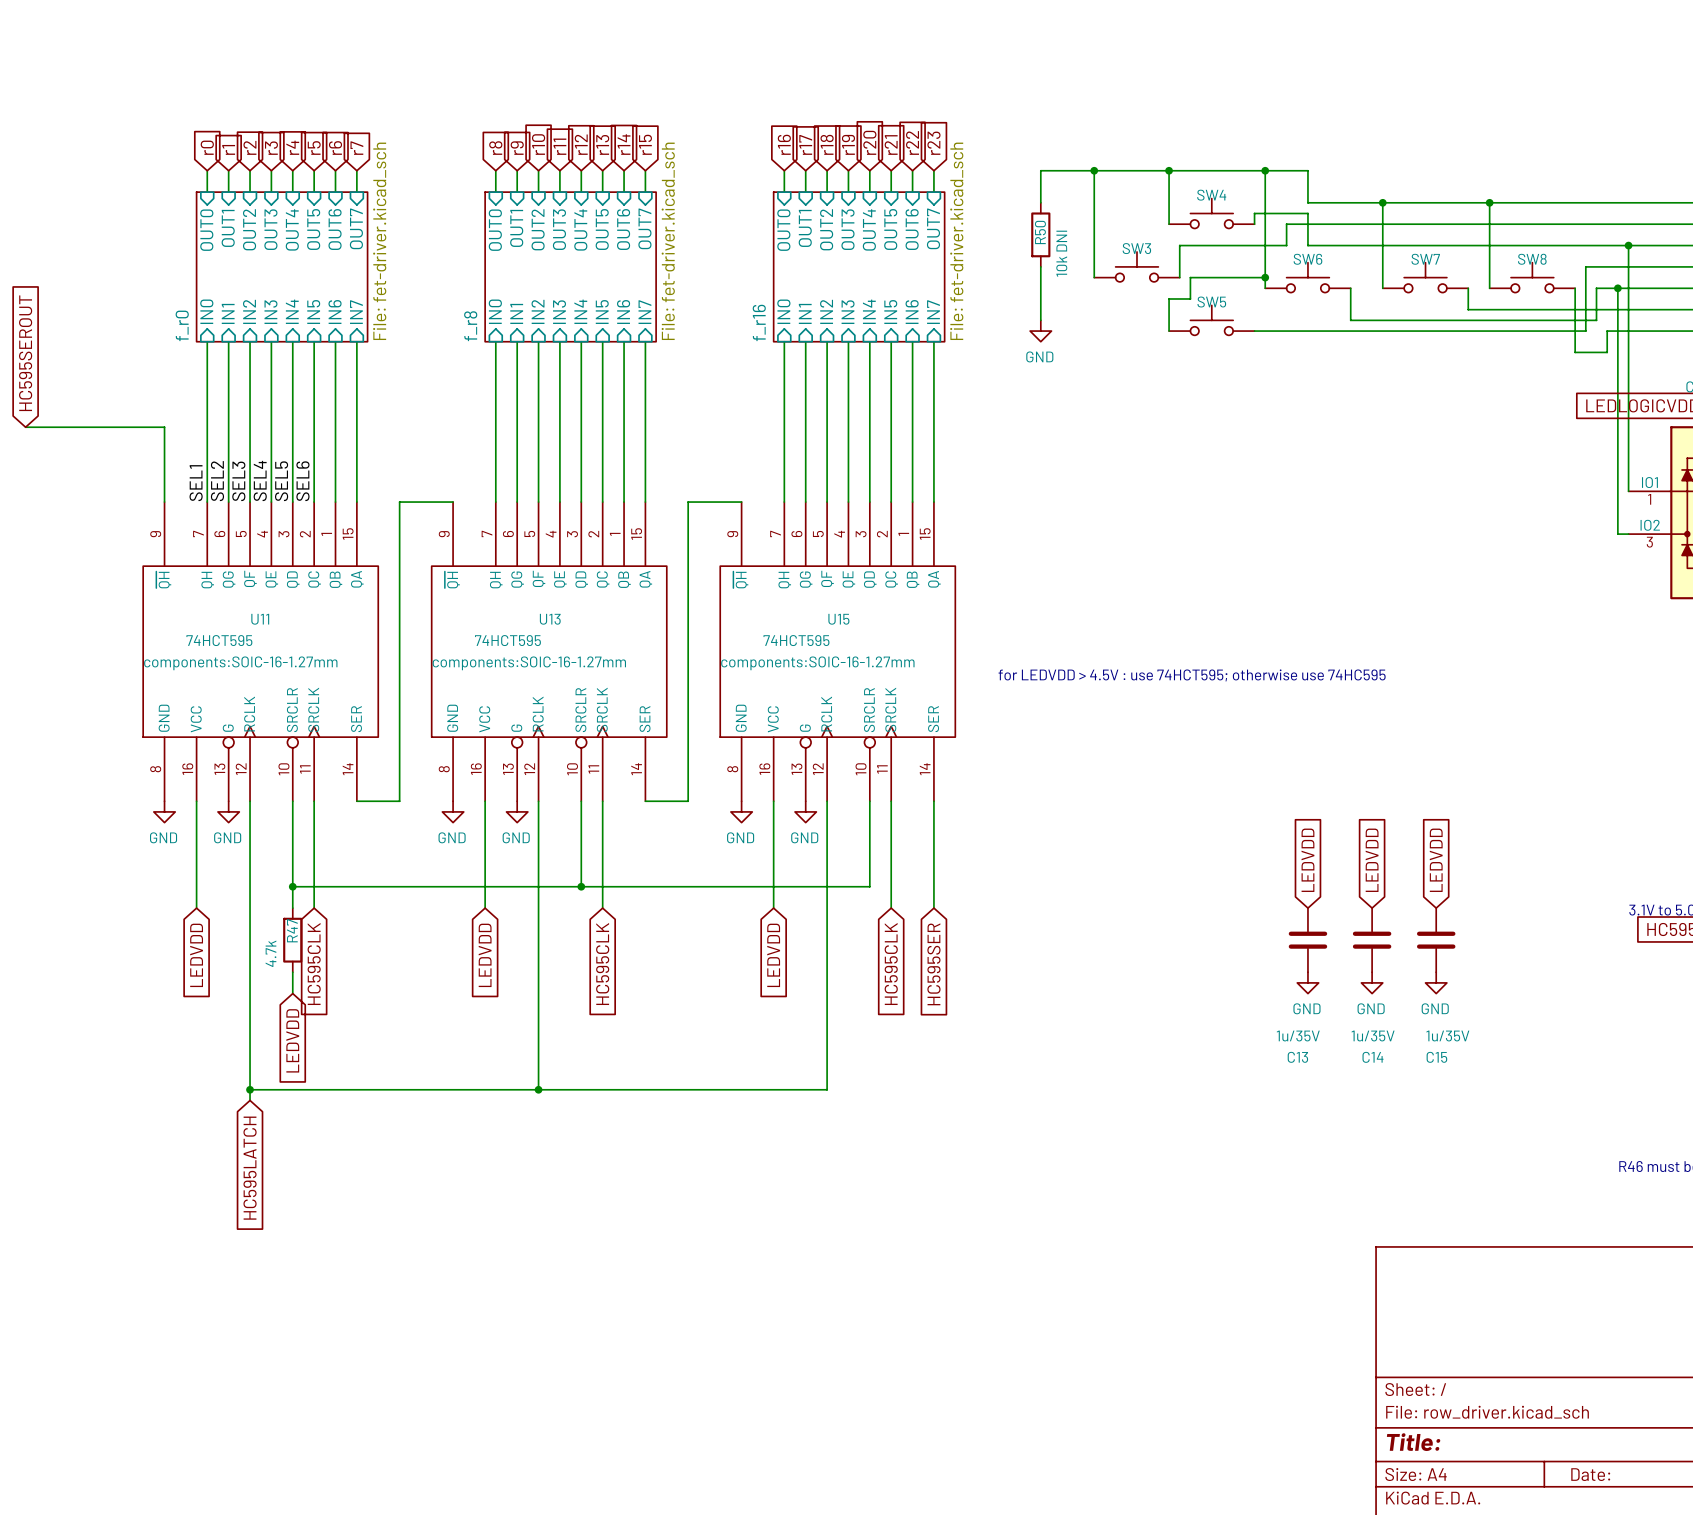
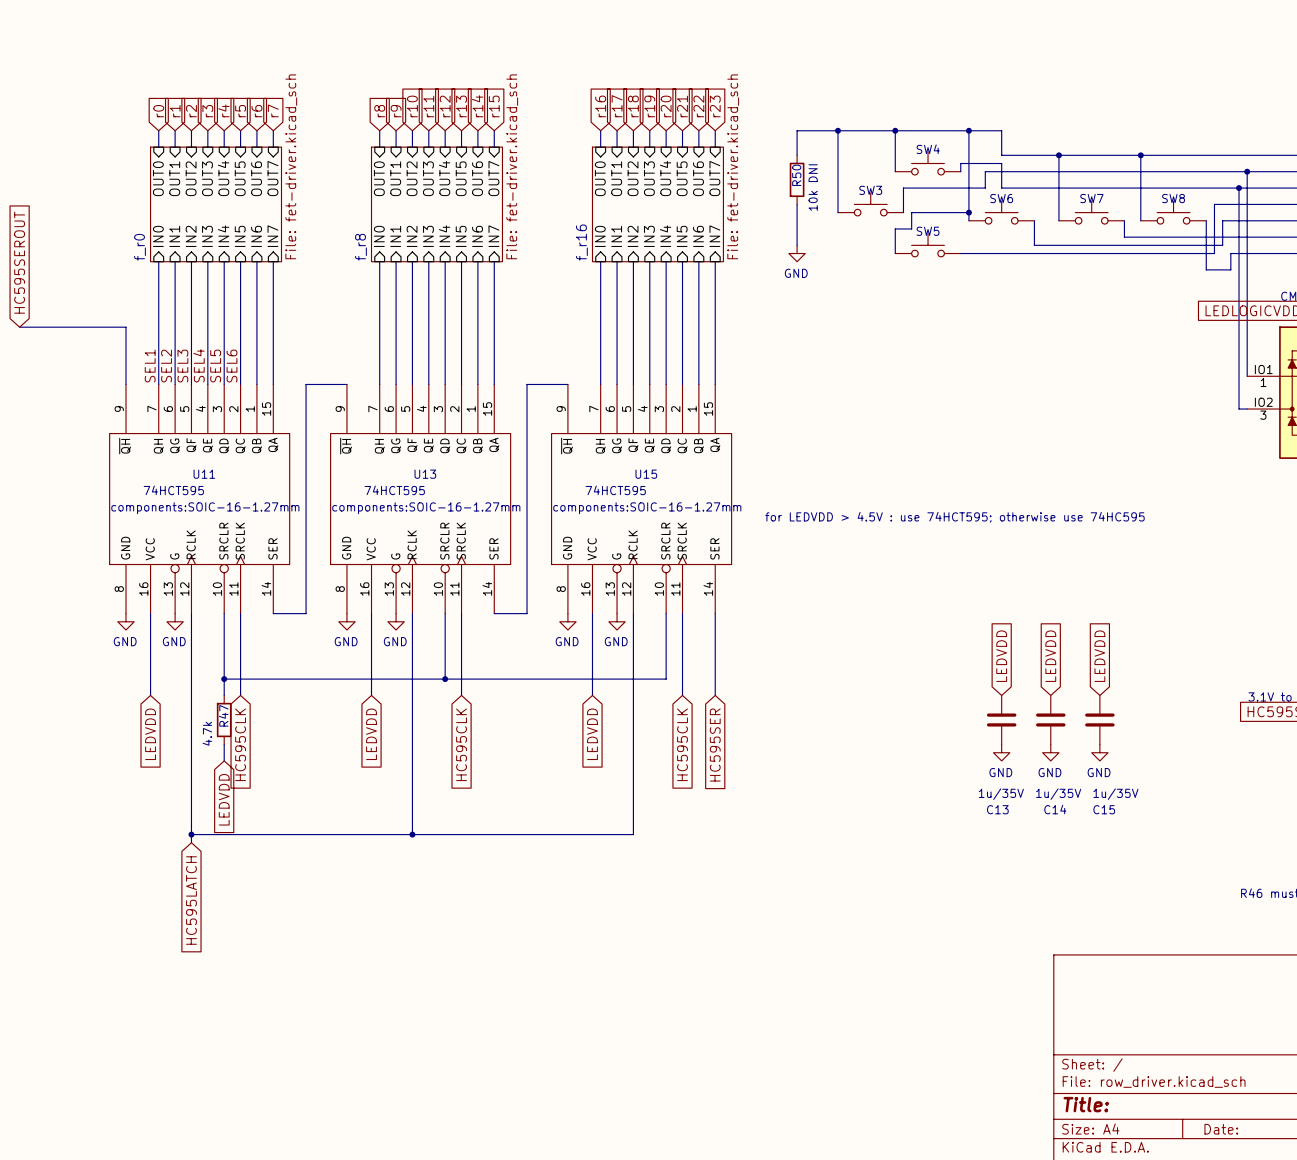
wire: none -> (1247, 171) (1247, 188)
junction: none -> (1247, 171)
wire: none -> (1239, 188) (1239, 220)
junction: none -> (1239, 188)
junction: (1628, 245) -> none
junction: (1617, 288) -> none

